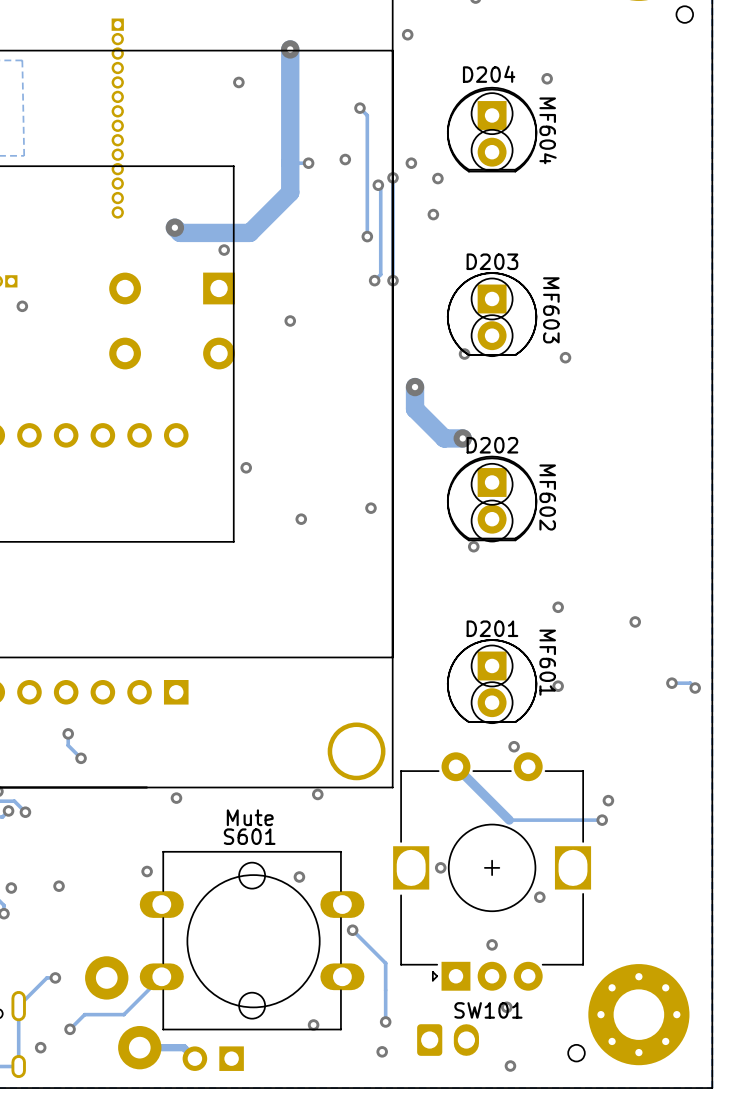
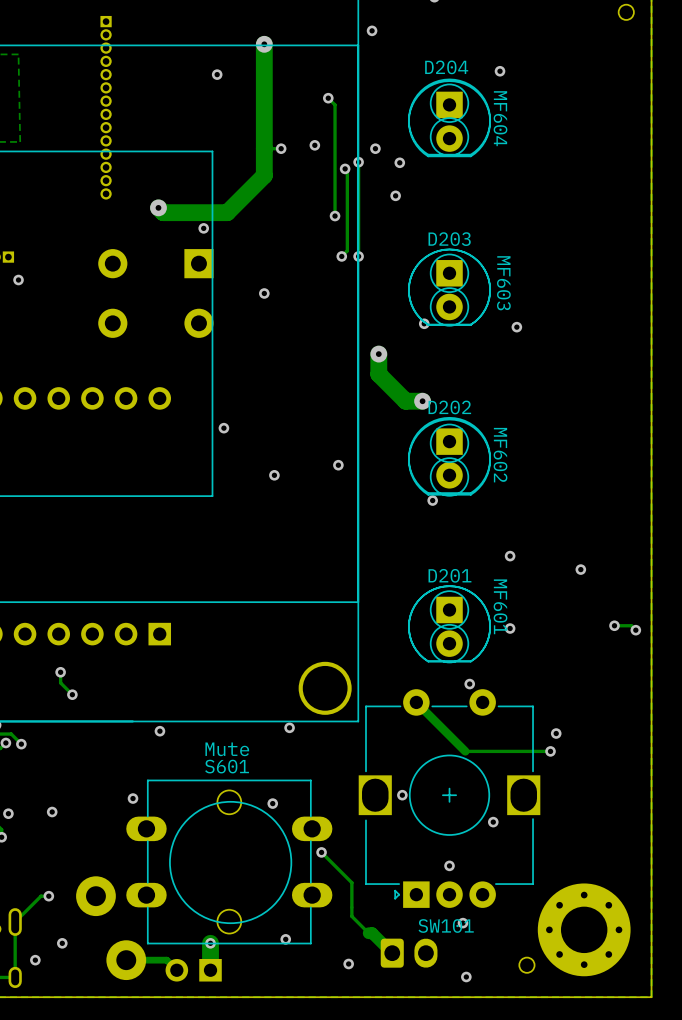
track: (161, 976) (123, 1014) (84, 1014) (70, 1029) -> none
track: (385, 999) (385, 1021) -> (351, 916) (392, 953)
via: (385, 1021) -> none
track: none -> (210, 943) (210, 970)
via: none -> (210, 943)

